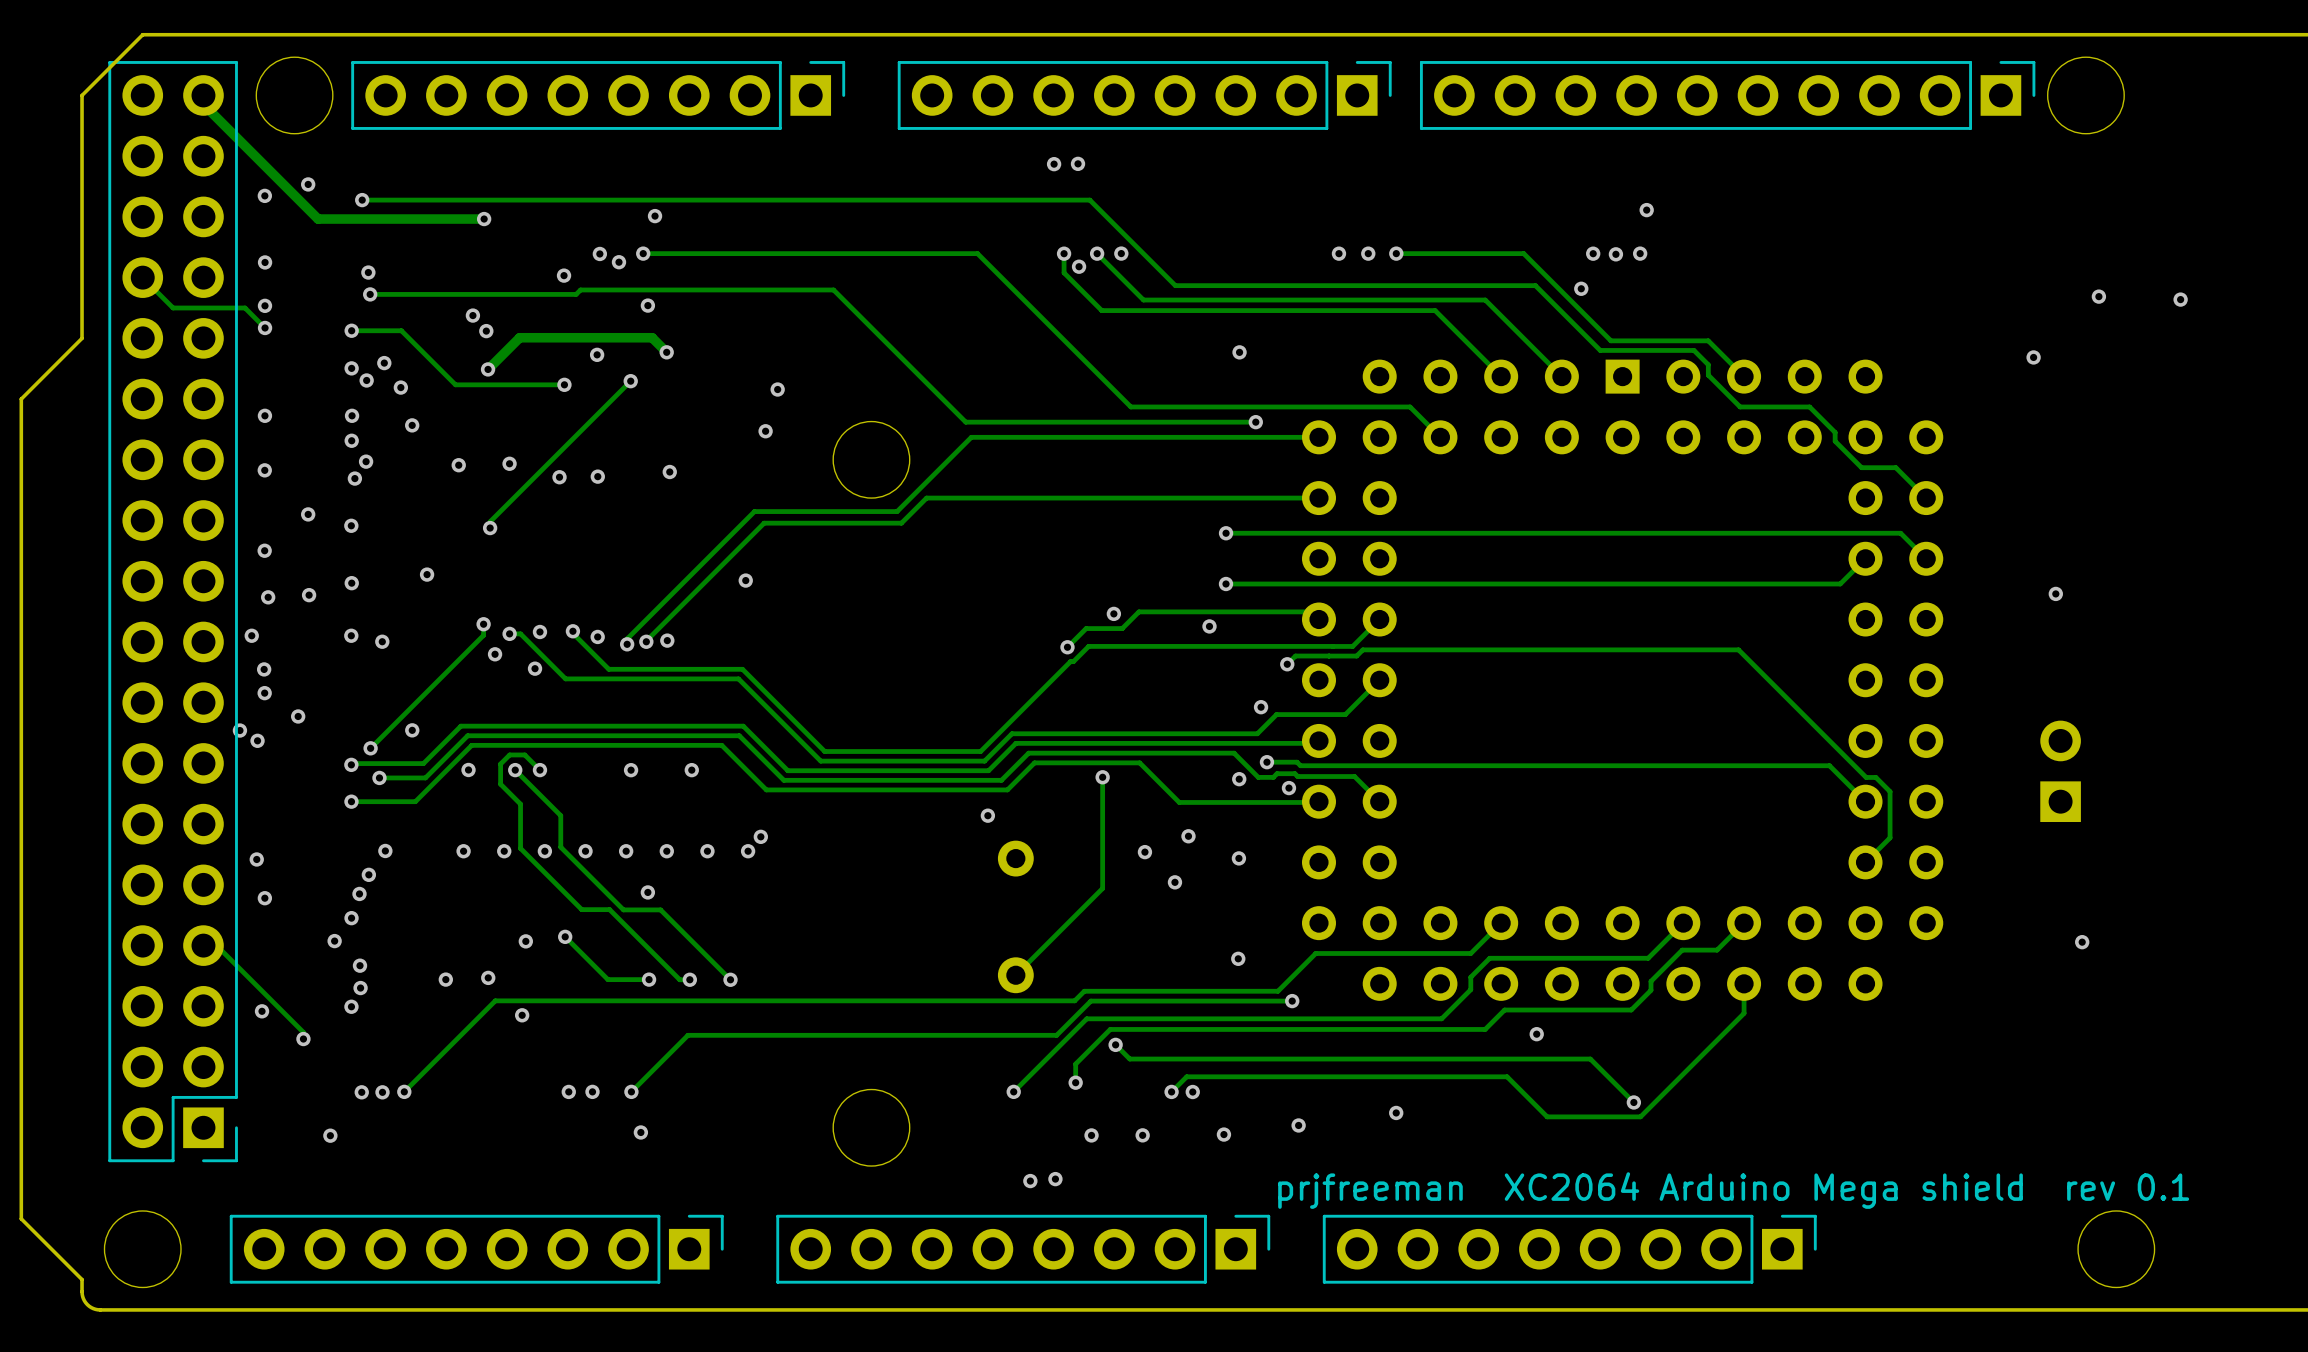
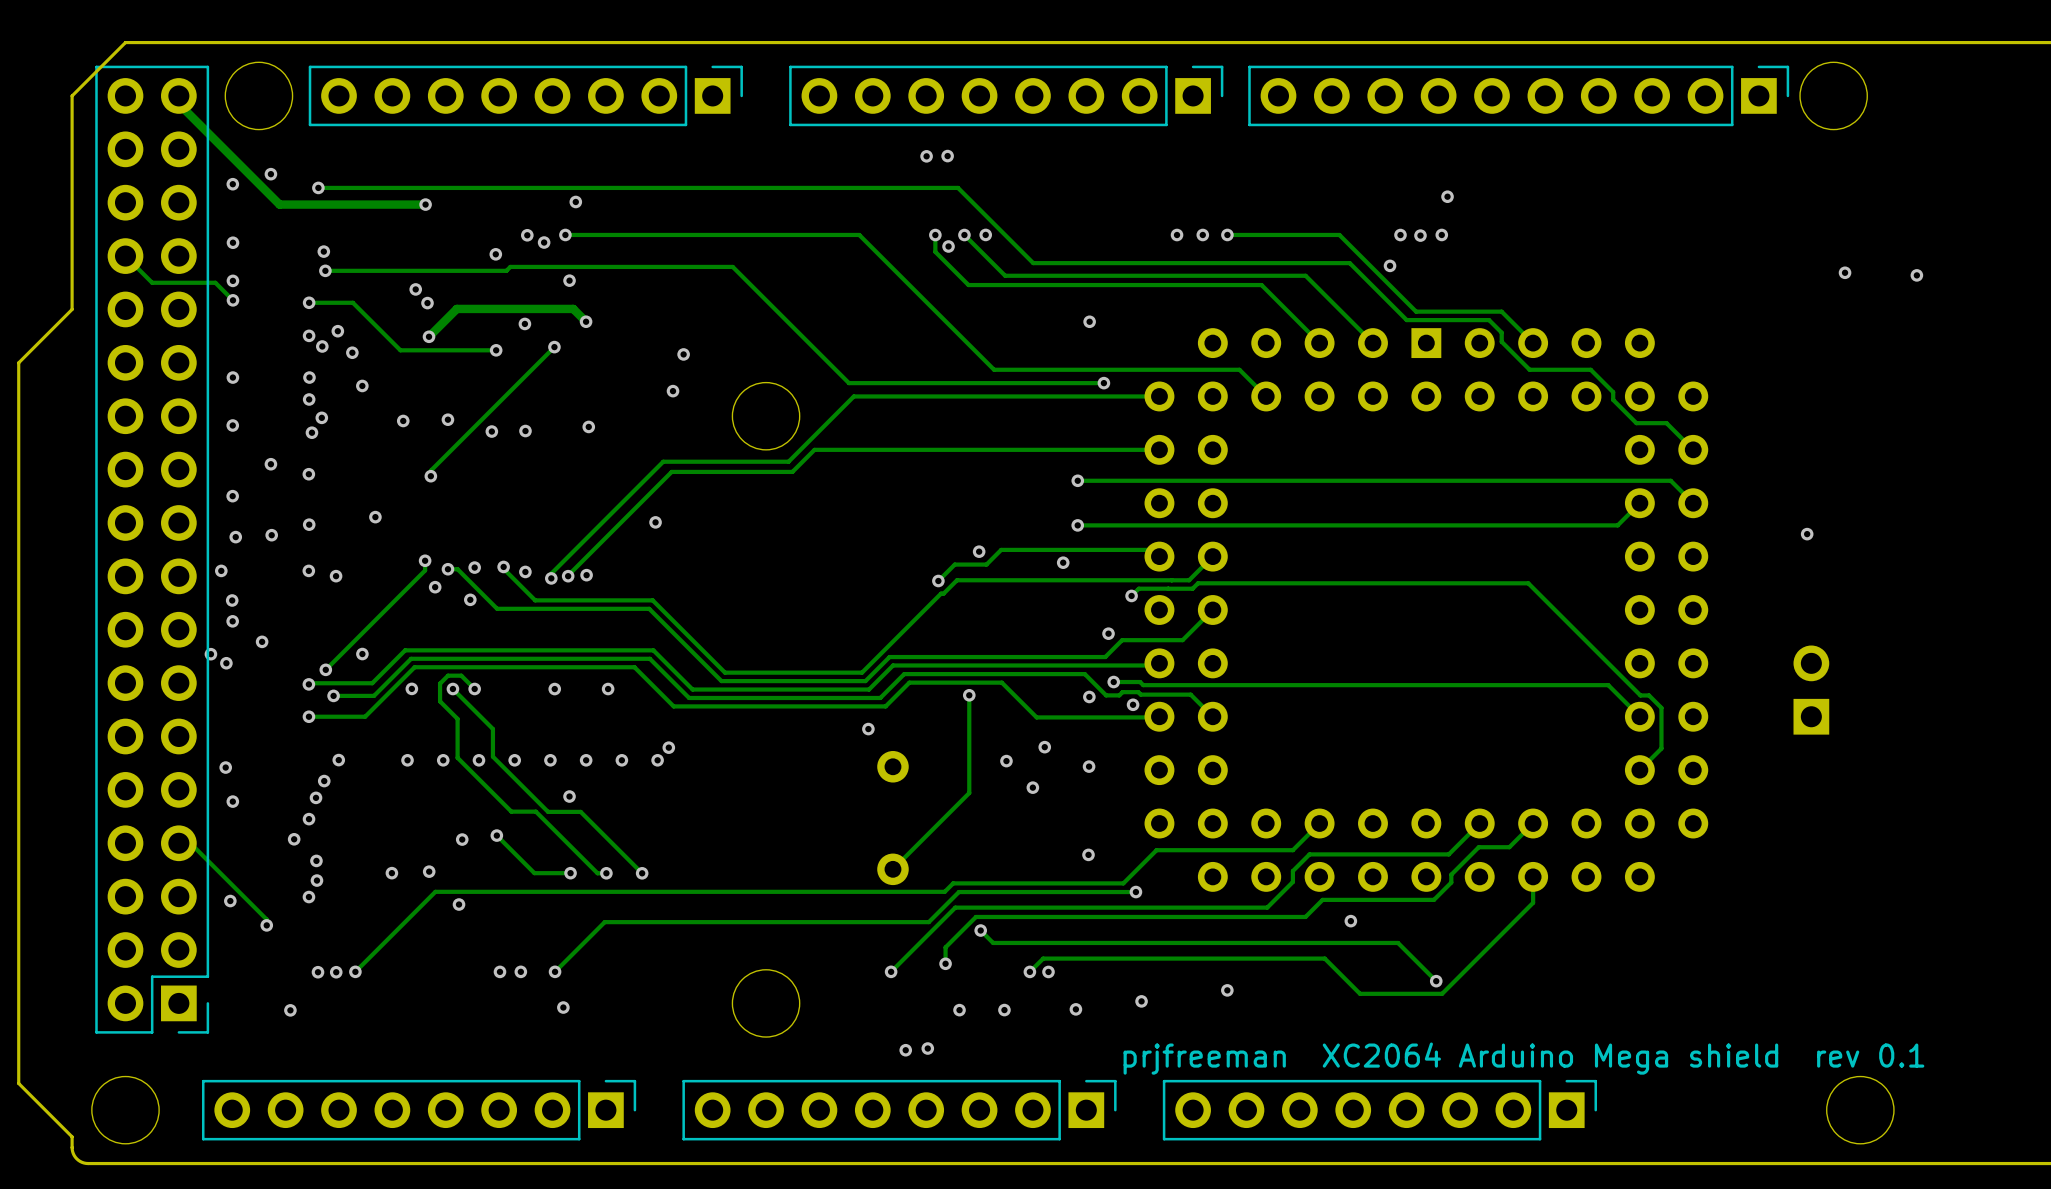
via: (2033, 357) -> none
via: (2082, 942) -> none

